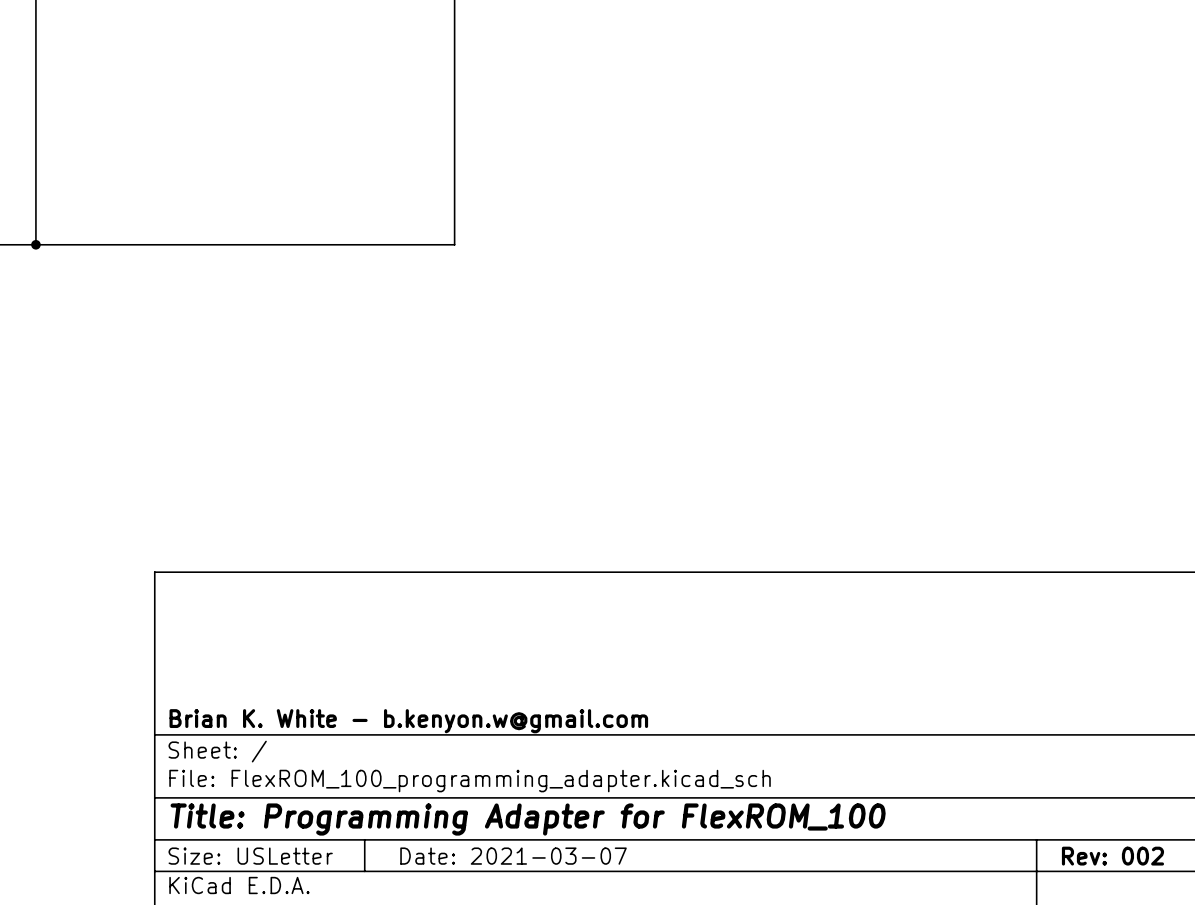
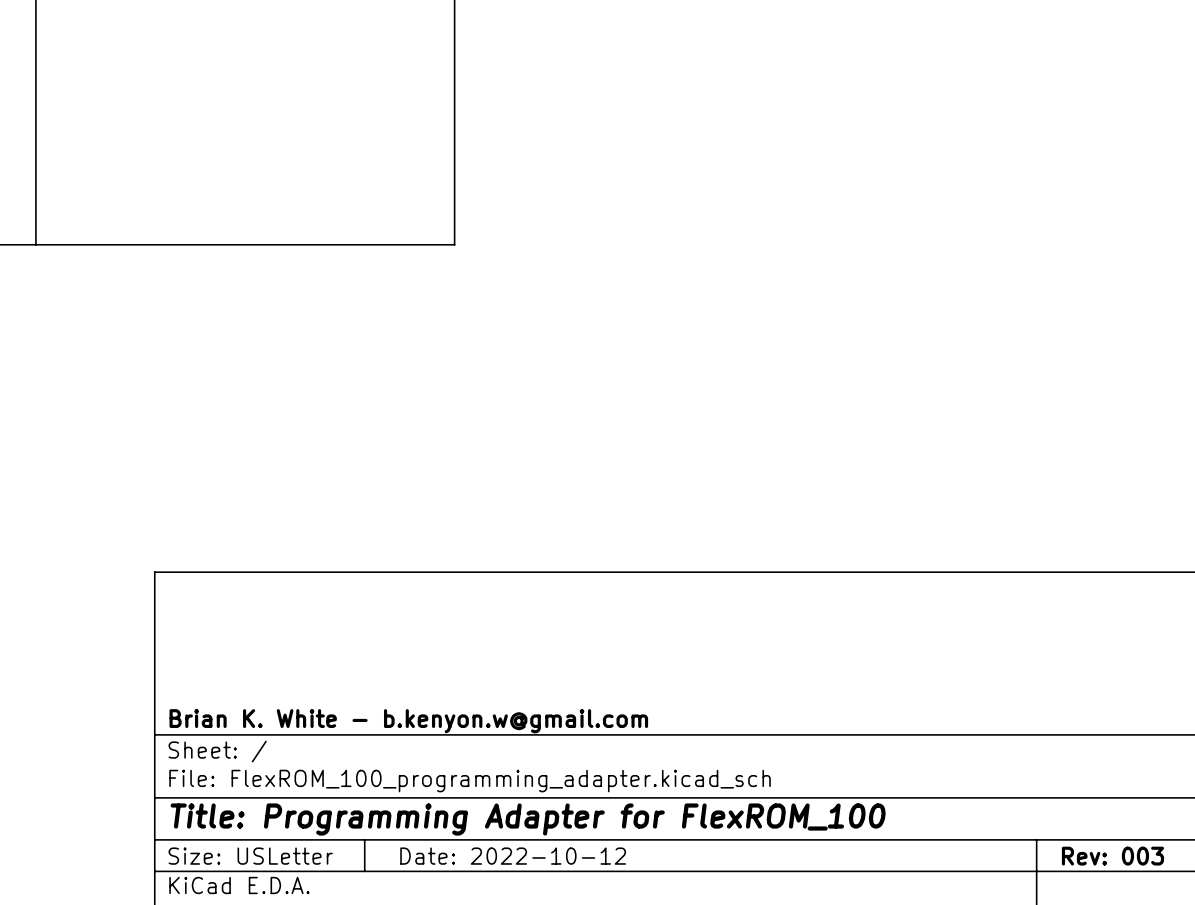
junction: (35, 244) -> none
title block: Date: 2021-03-07 (513, 856) -> Date: 2022-10-12 (513, 856)
title block: Rev: 002 (1112, 856) -> Rev: 003 (1112, 856)

